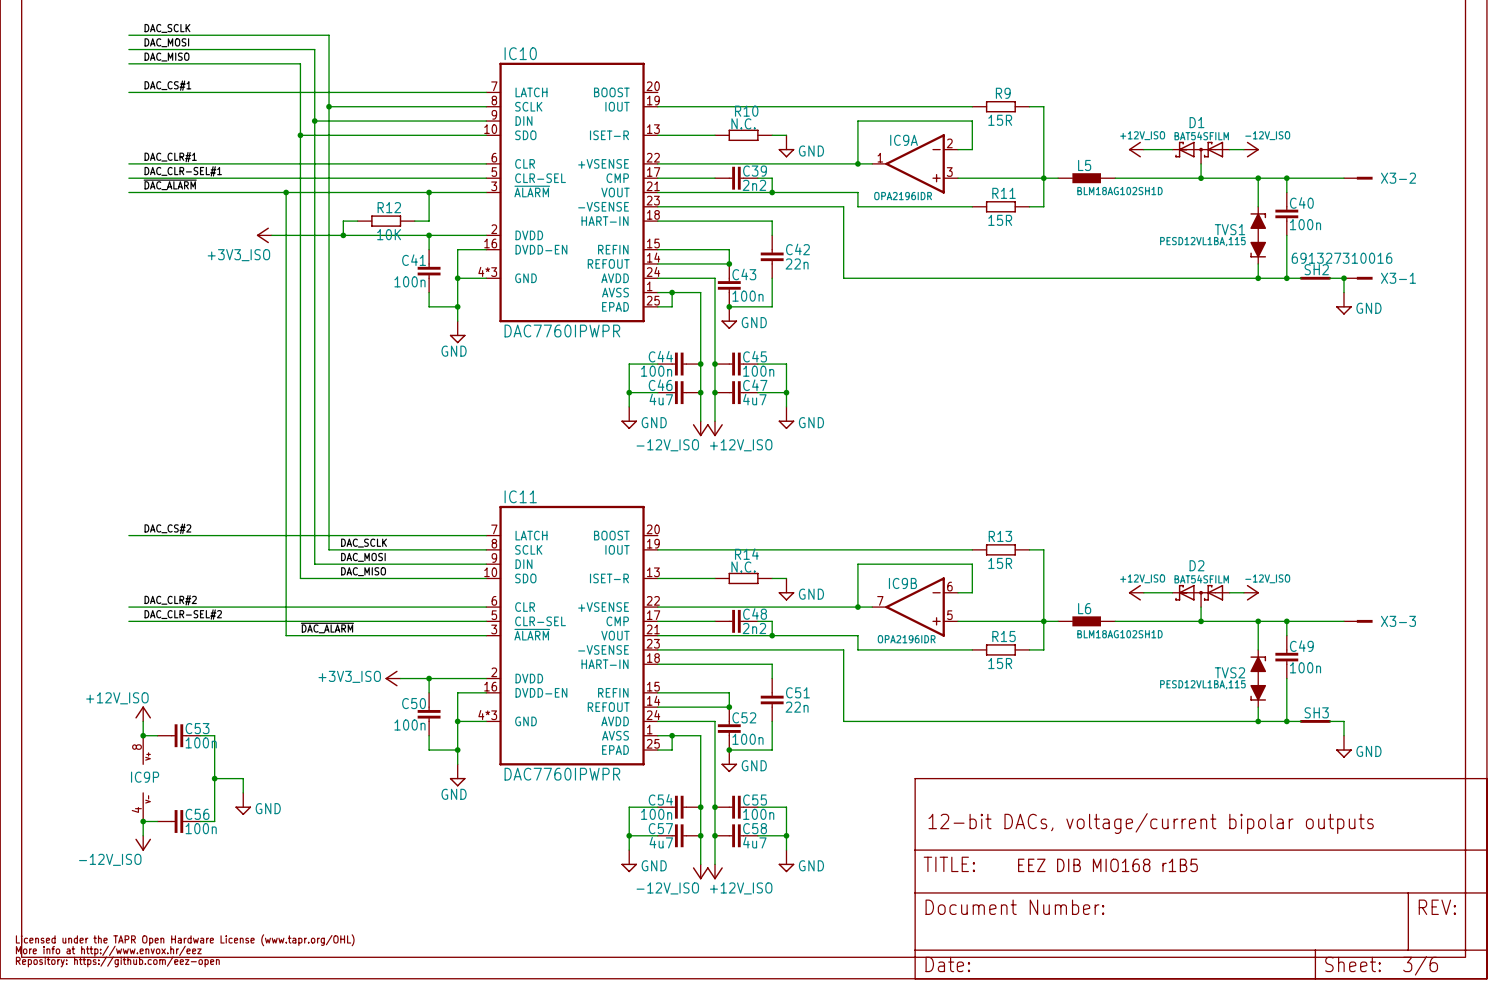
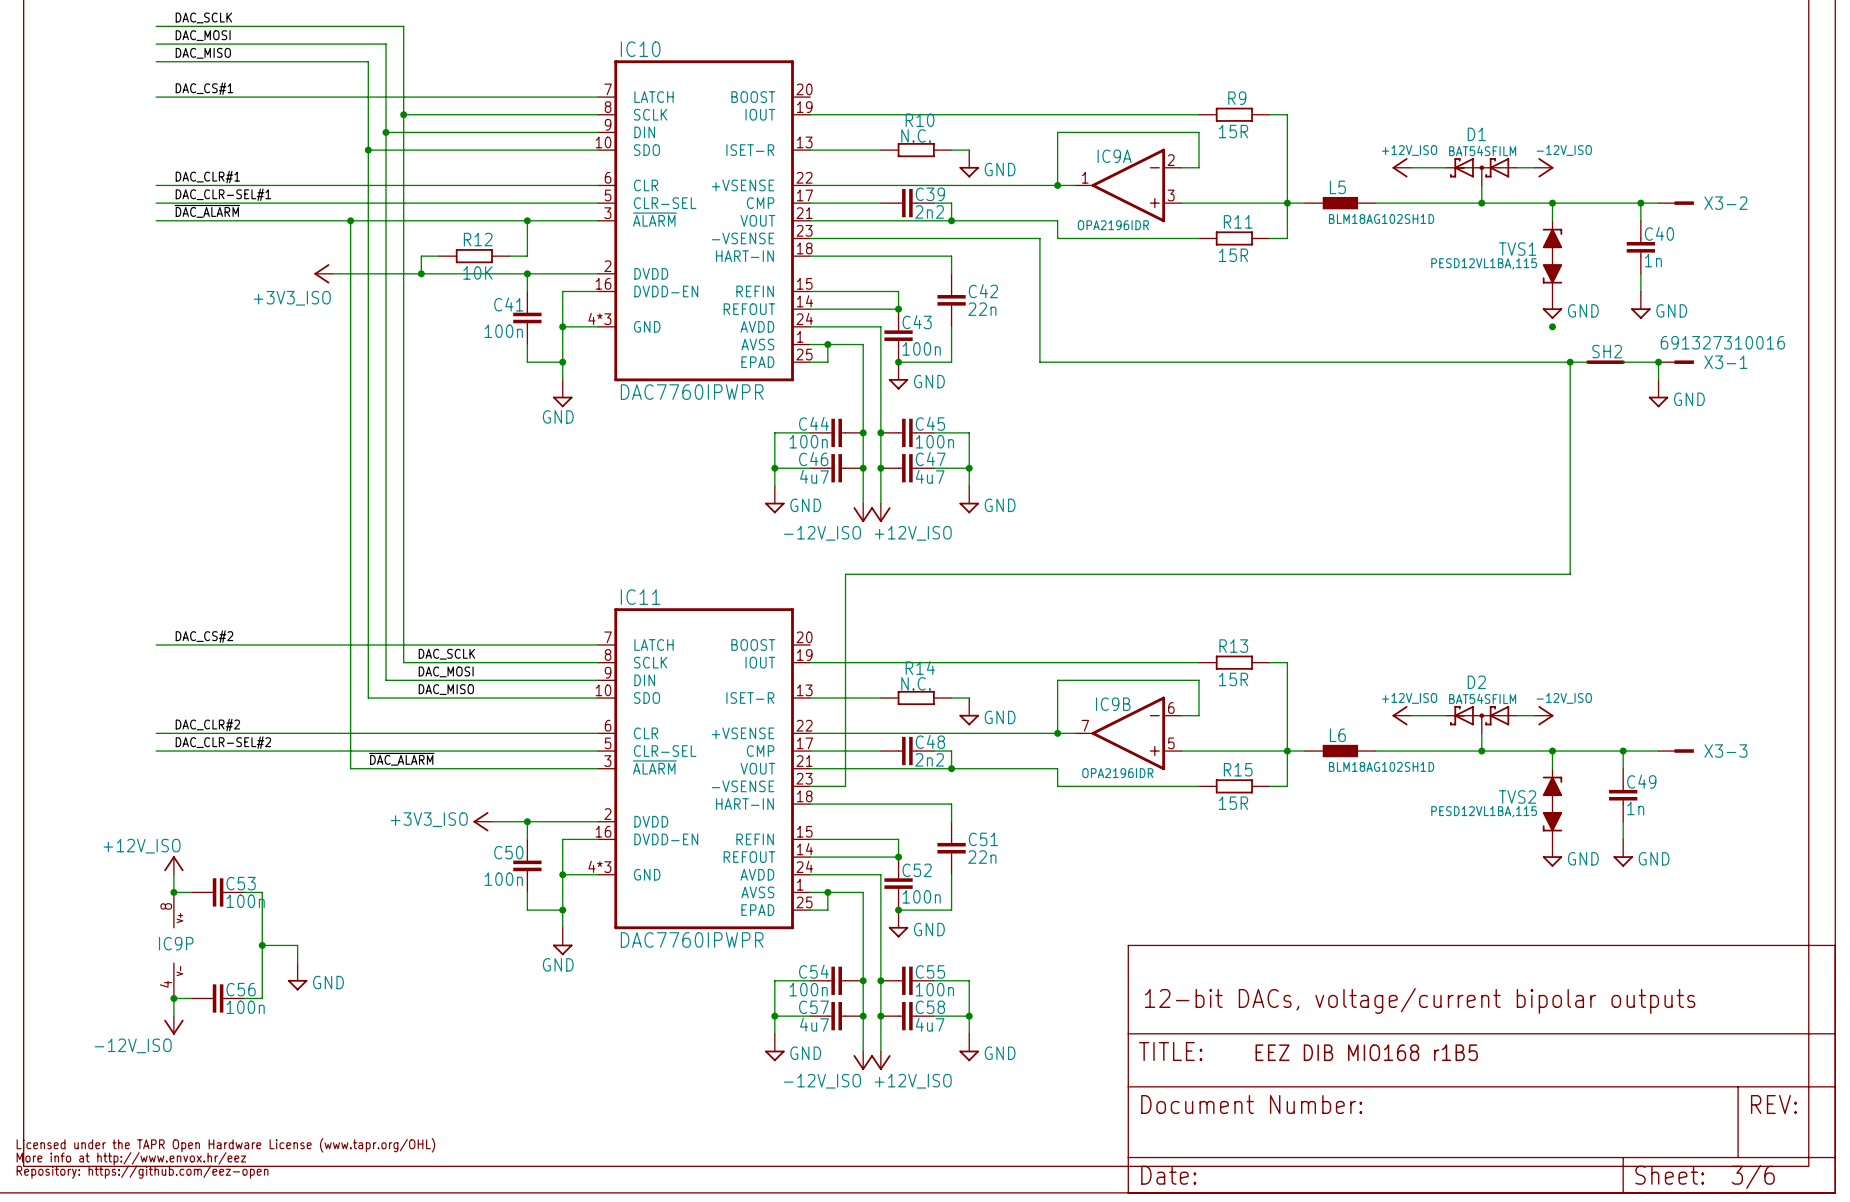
wire: (1286, 178) (1286, 192) -> (1640, 203) (1640, 220)
junction: (1286, 178) -> none
junction: none -> (1640, 203)
C40 position: (1286, 213) -> (1640, 247)
C40 value: 100n (1305, 224) -> 1n (1653, 260)
TVS1 position: (1258, 235) -> (1552, 256)
wire: (1286, 235) (1286, 278) -> none
X3-1 value position: 691327310016 (1342, 258) -> 691327310016 (1722, 342)
power symbol: none -> GND (1552, 305)
power symbol: none -> GND (1640, 305)
wire: (1258, 263) (1258, 278) -> (1640, 273) (1640, 291)
wire: (843, 278) (1301, 278) -> (1039, 326) (1039, 362) (1587, 362)
junction: (1286, 278) -> none
SH2 position: (1315, 278) -> (1605, 362)
wire: (1329, 278) (1343, 278) (1343, 292) -> none
junction position: (1343, 278) -> (1658, 362)
X3-1 position: (1358, 278) -> (1676, 362)
power symbol: GND (1343, 303) -> none
junction: none -> (1570, 362)
wire: none -> (1623, 362) (1658, 362) (1658, 379)
power symbol: none -> GND (1658, 393)
wire: (1286, 621) (1286, 635) -> (1623, 751) (1623, 768)
junction position: (1286, 621) -> (1623, 751)
wire: (686, 649) (843, 649) (843, 721) (1301, 721) -> (845, 786) (845, 574) (1570, 574) (1570, 362)
C49 position: (1286, 657) -> (1623, 795)
C49 value: 100n (1305, 667) -> 1n (1635, 808)
TVS2 position: (1258, 678) -> (1552, 804)
wire: (1286, 678) (1286, 721) -> none
power symbol: none -> GND (1552, 853)
power symbol: none -> GND (1623, 853)
wire: (1258, 707) (1258, 721) -> (1623, 821) (1623, 839)
junction: (1258, 721) -> none
junction: (1286, 721) -> none
SH3: (1315, 721) -> none
wire: (1329, 721) (1343, 721) (1343, 735) -> none
power symbol: GND (1343, 746) -> none

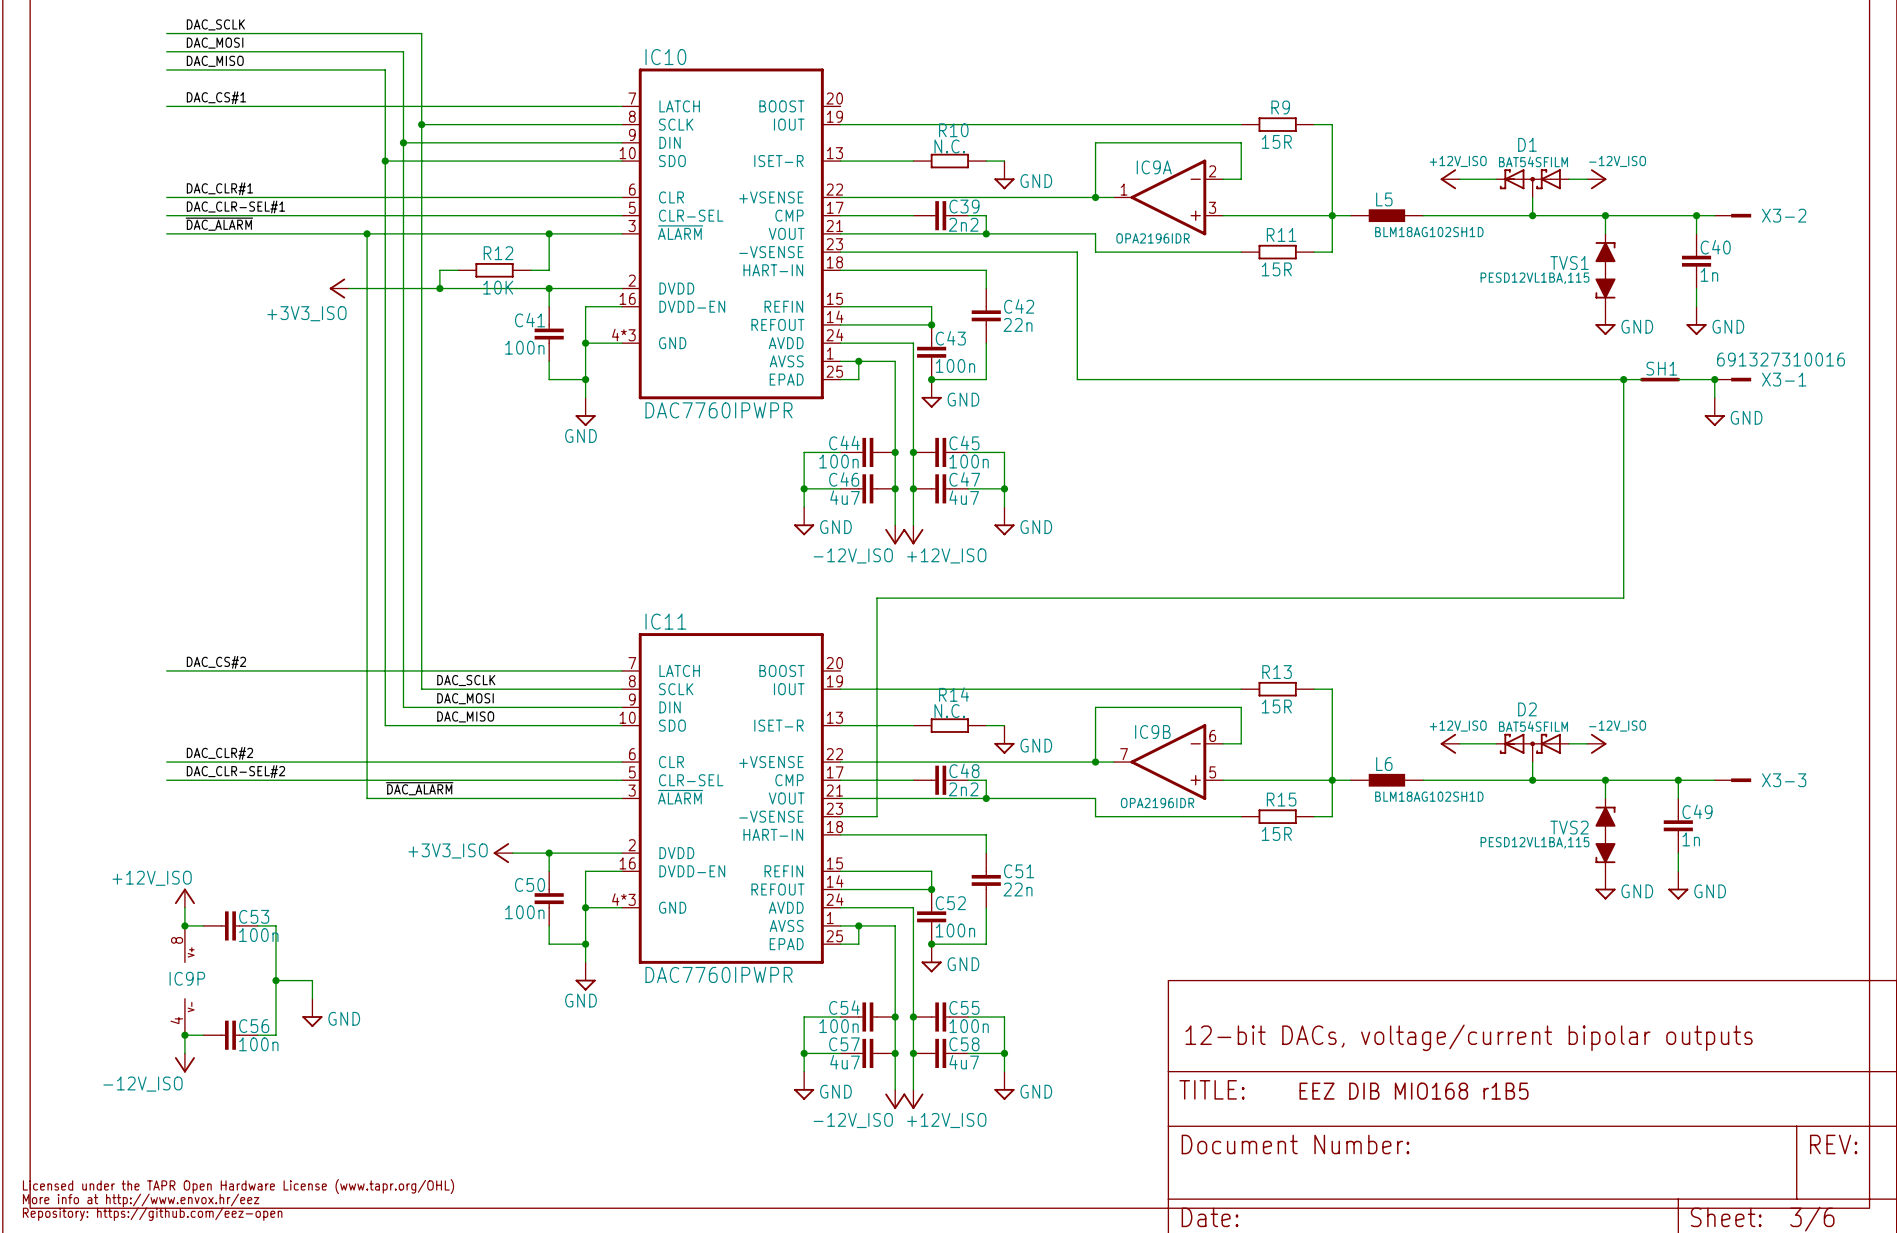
junction: (1552, 326) -> none
SH2 name: SH2 (1607, 351) -> SH1 (1661, 368)

